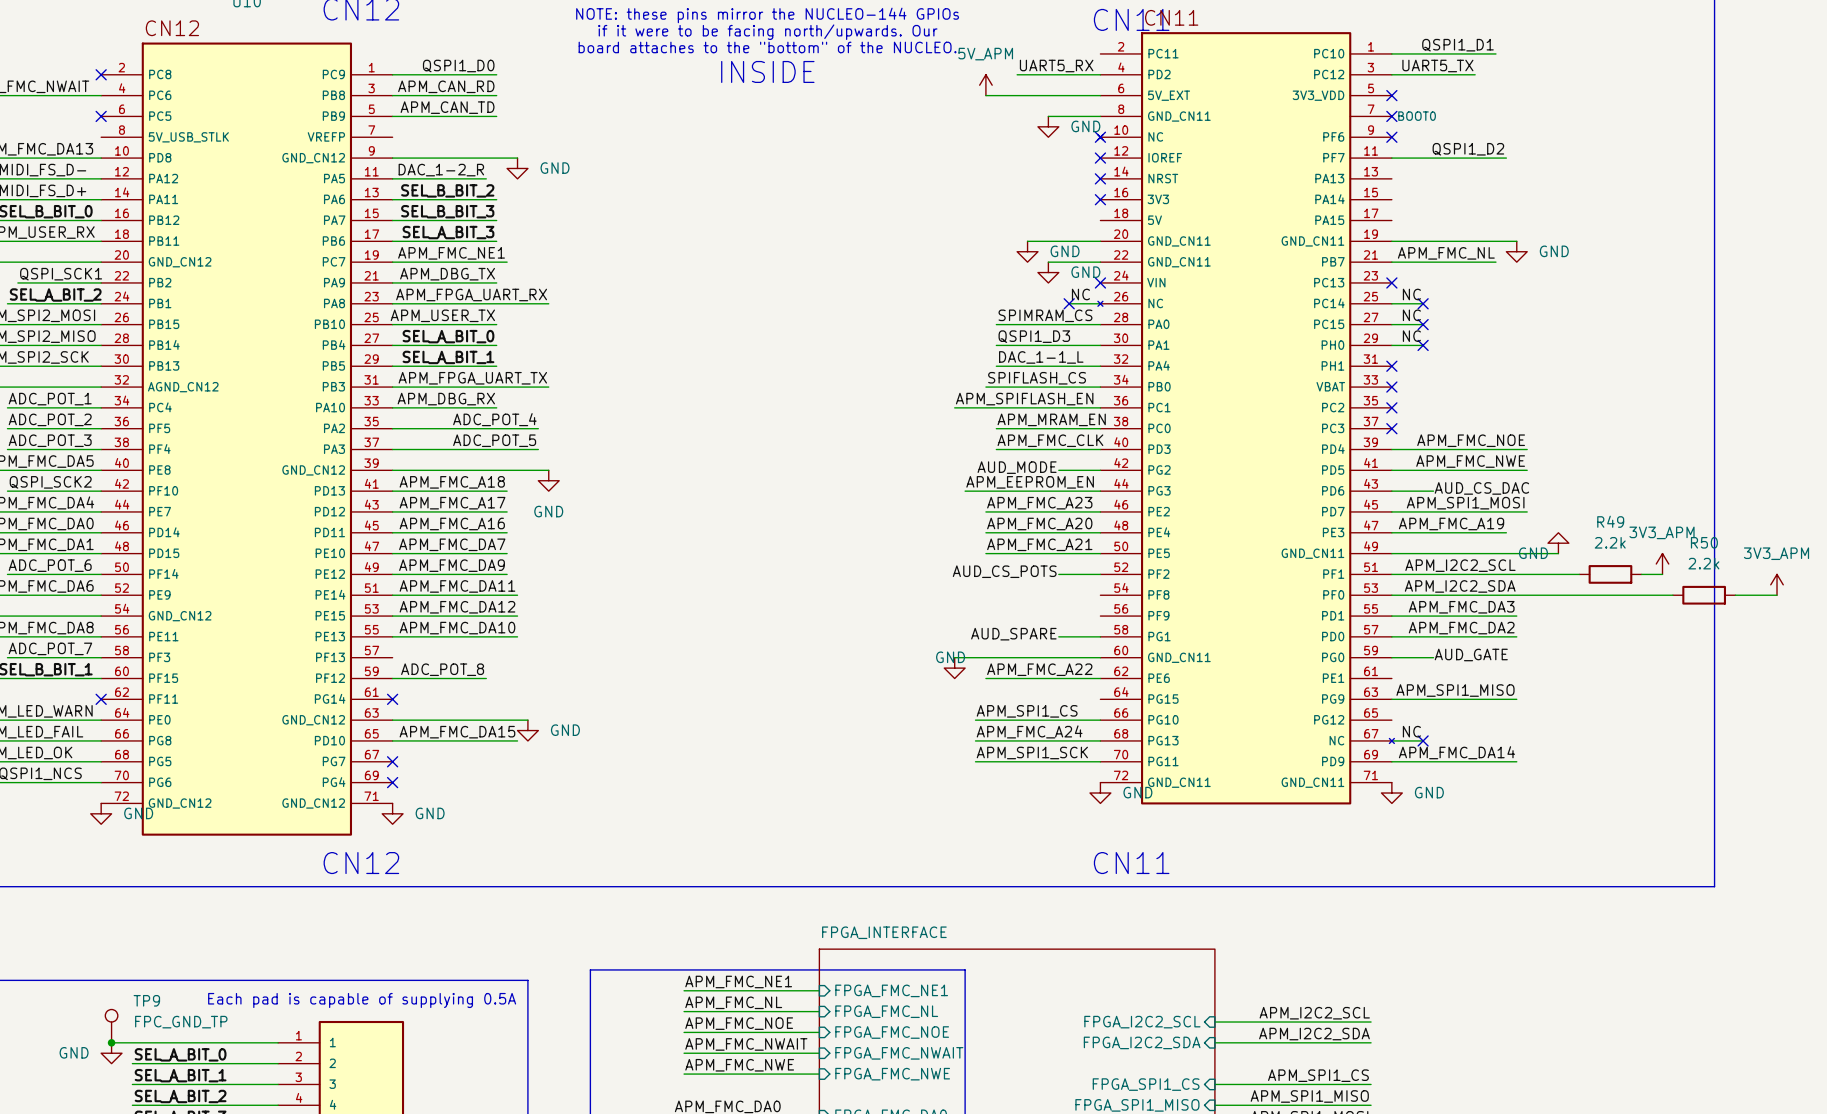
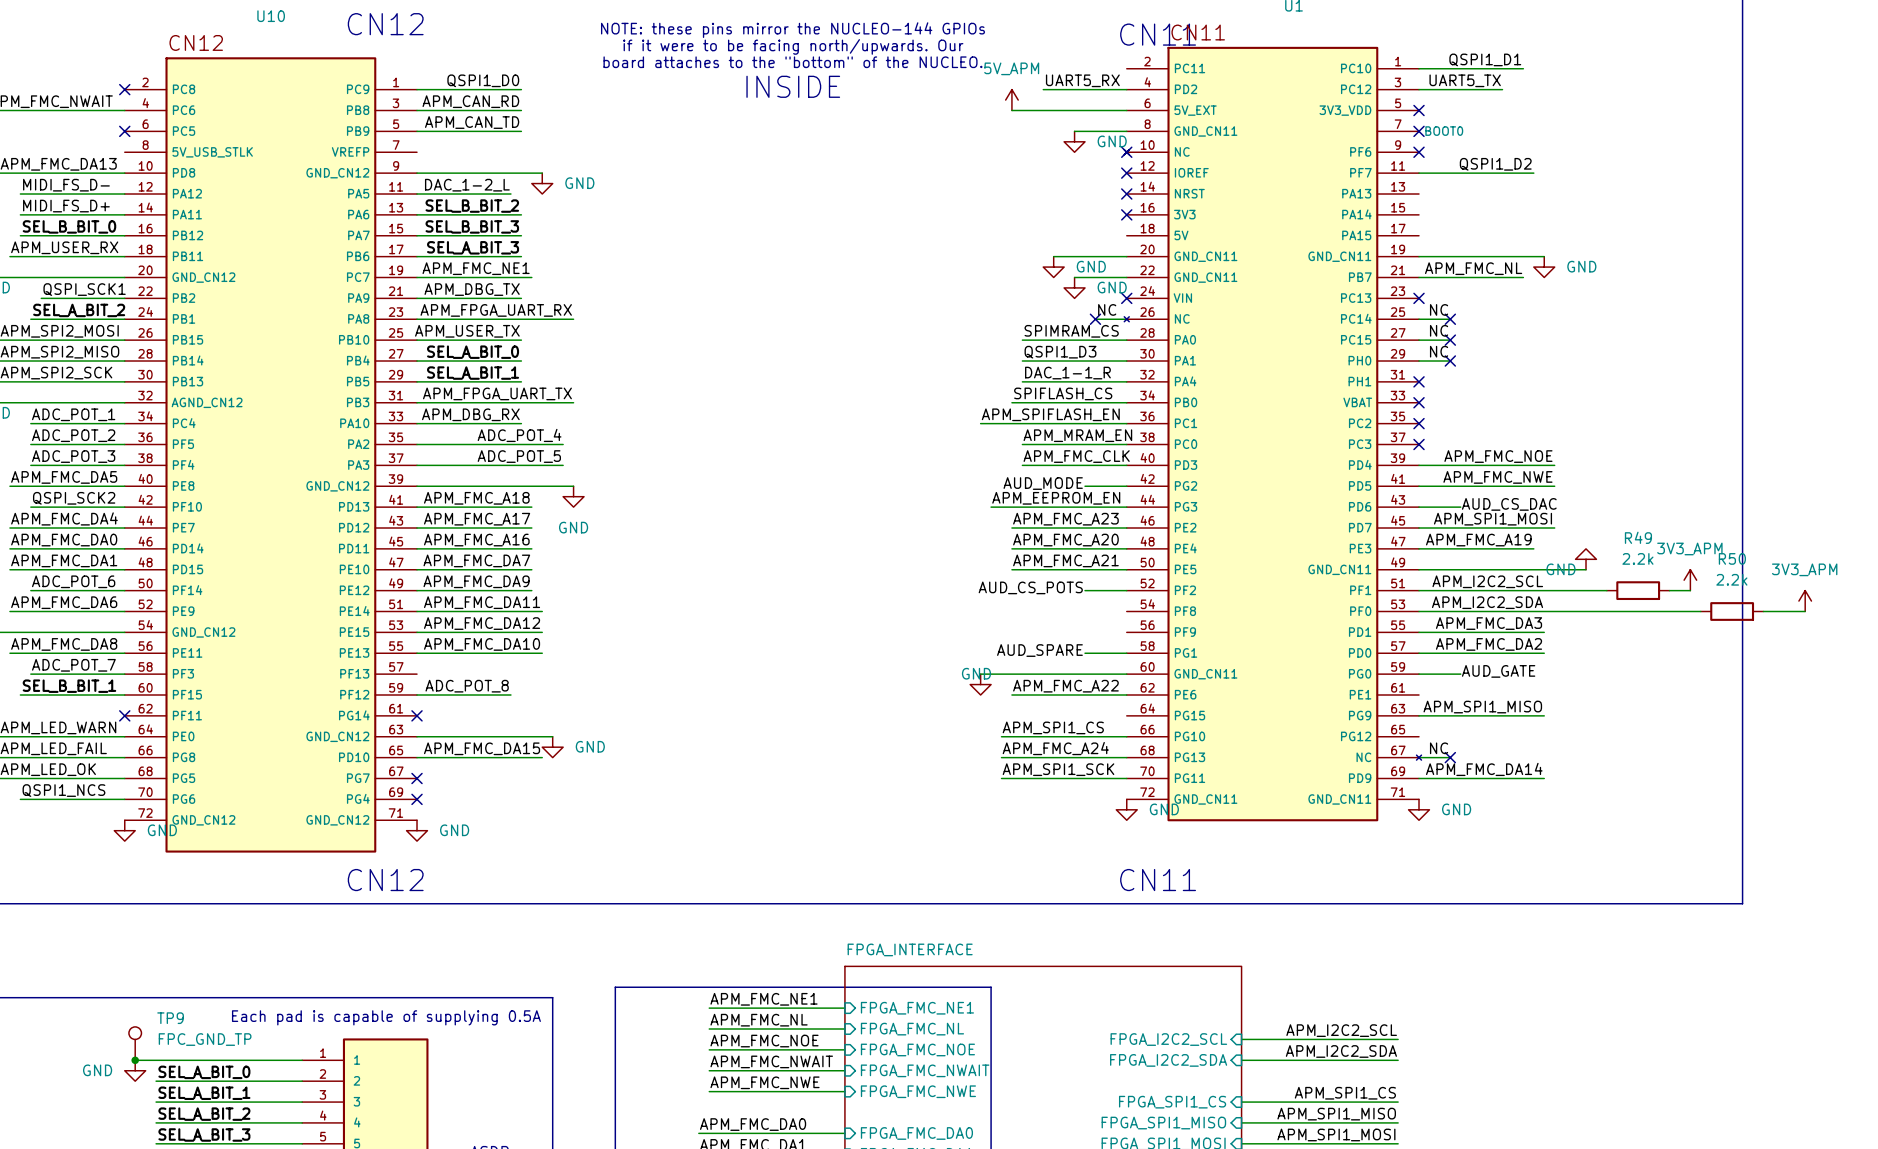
label: DAC_1-2_R (441, 170) -> DAC_1-2_L (467, 185)
label: DAC_1-1_L (1041, 357) -> DAC_1-1_R (1067, 373)

